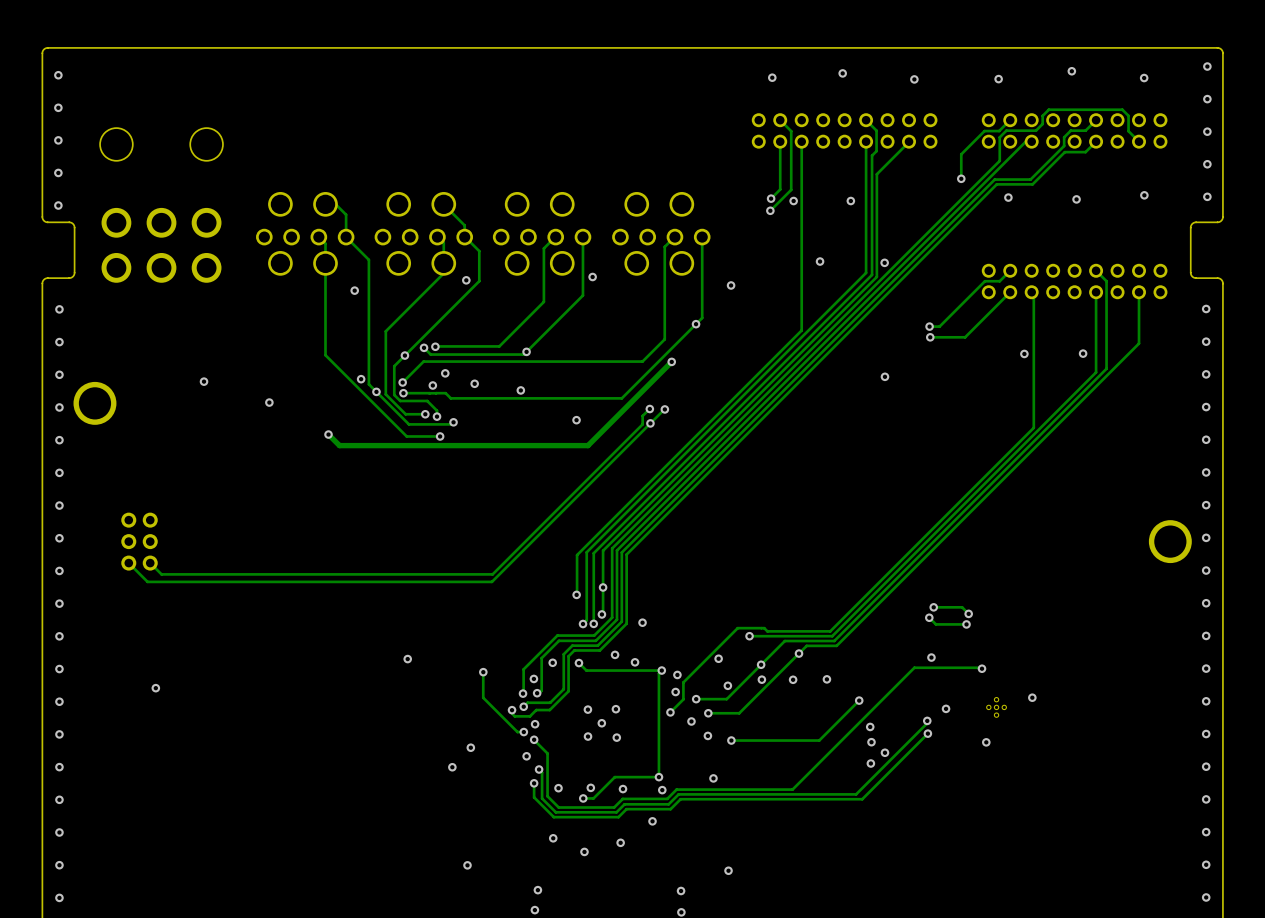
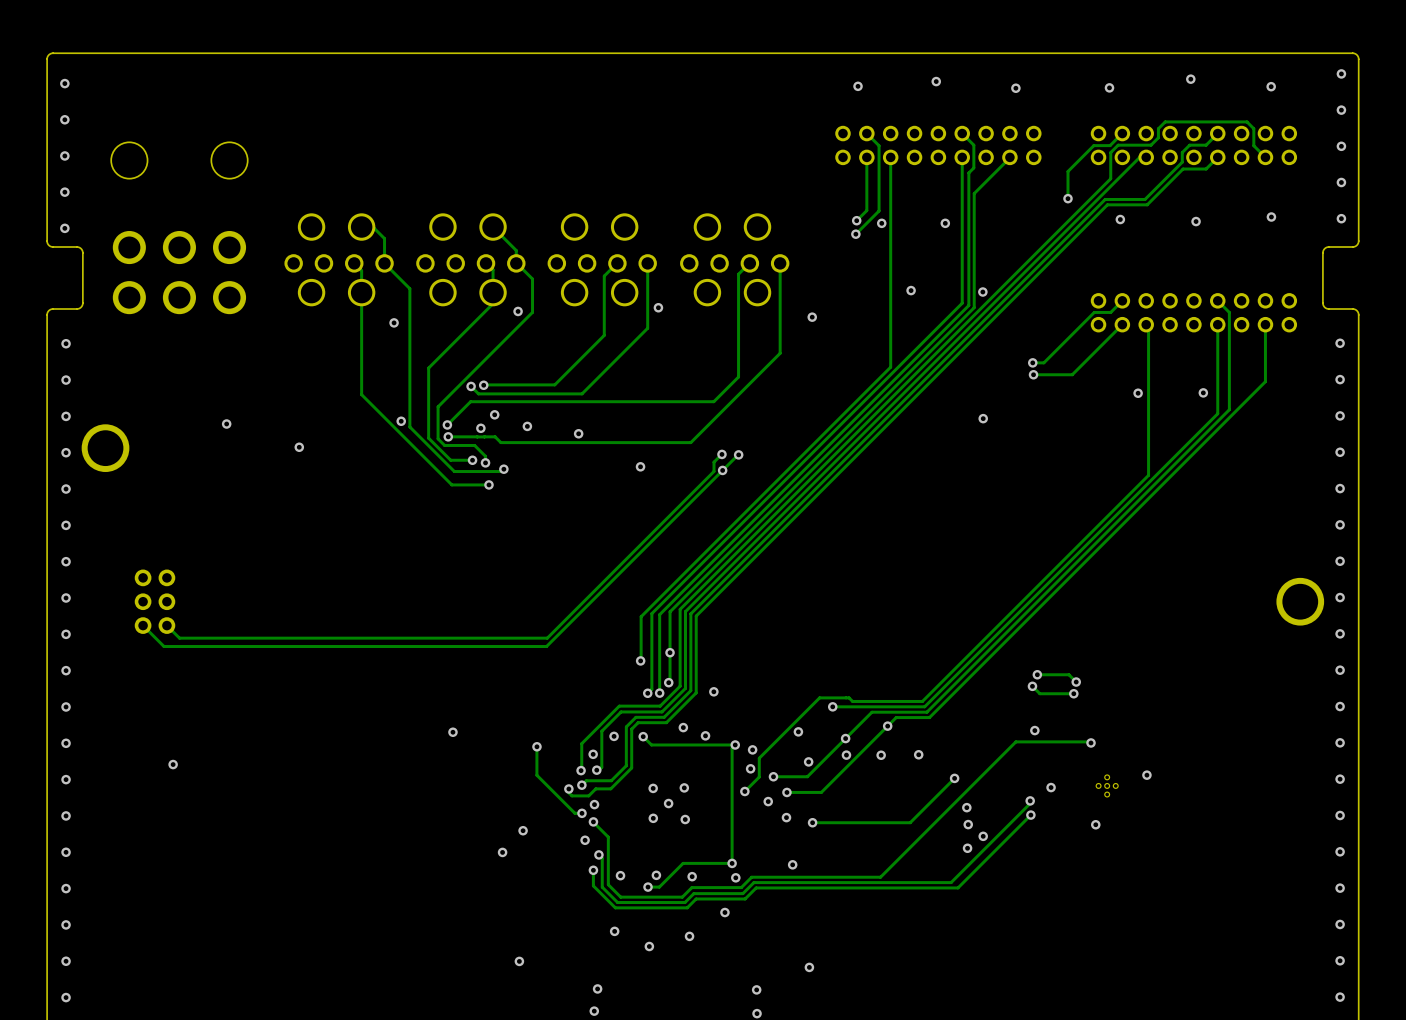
via: (696, 324) -> none
via: (526, 351) -> none
via: (404, 355) -> none
track: (671, 361) (588, 445) (339, 445) (328, 434) -> none
via: (671, 361) -> none
via: (376, 391) -> none
via: (328, 434) -> none

